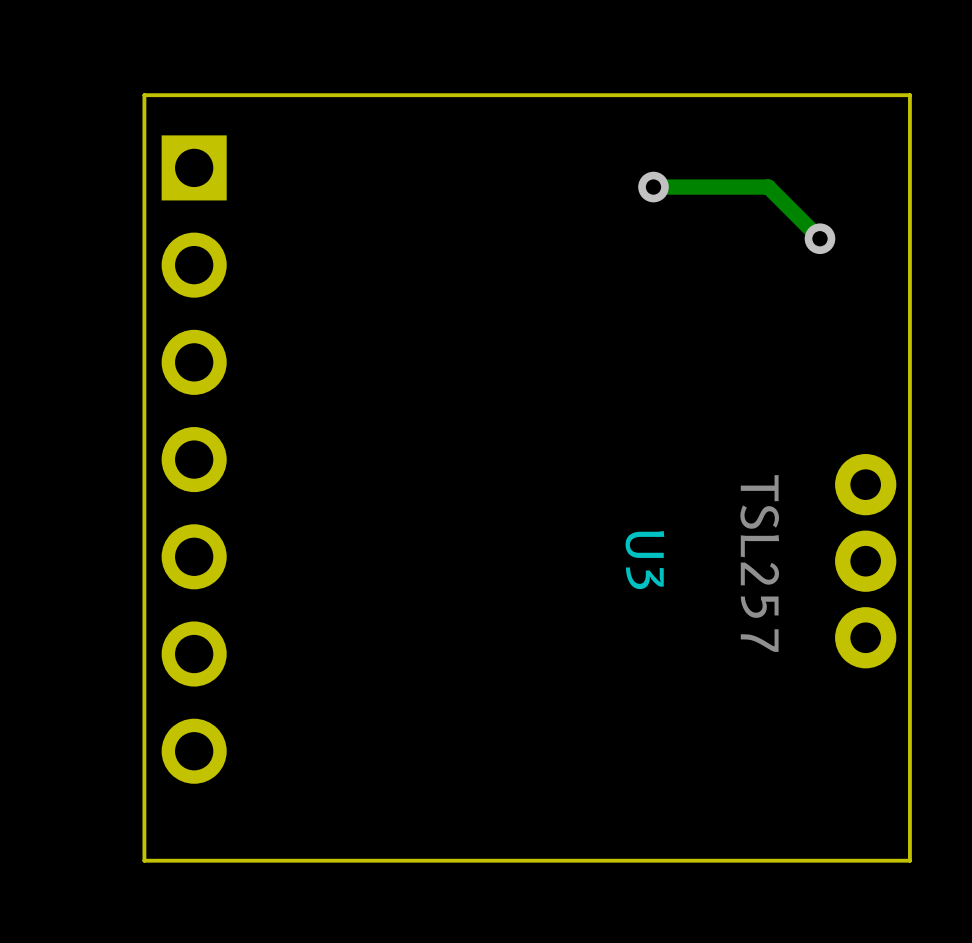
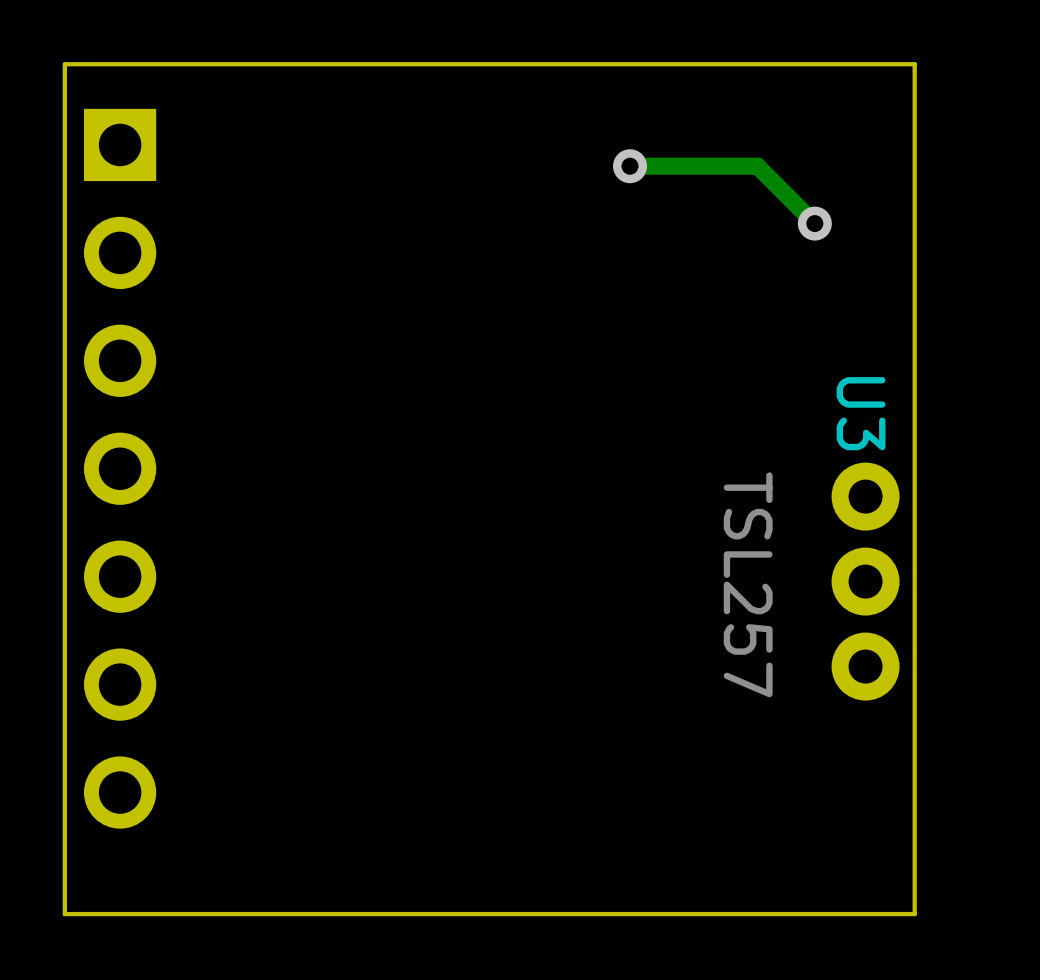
U3 name position: U3 (644, 560) -> U3 (861, 413)

